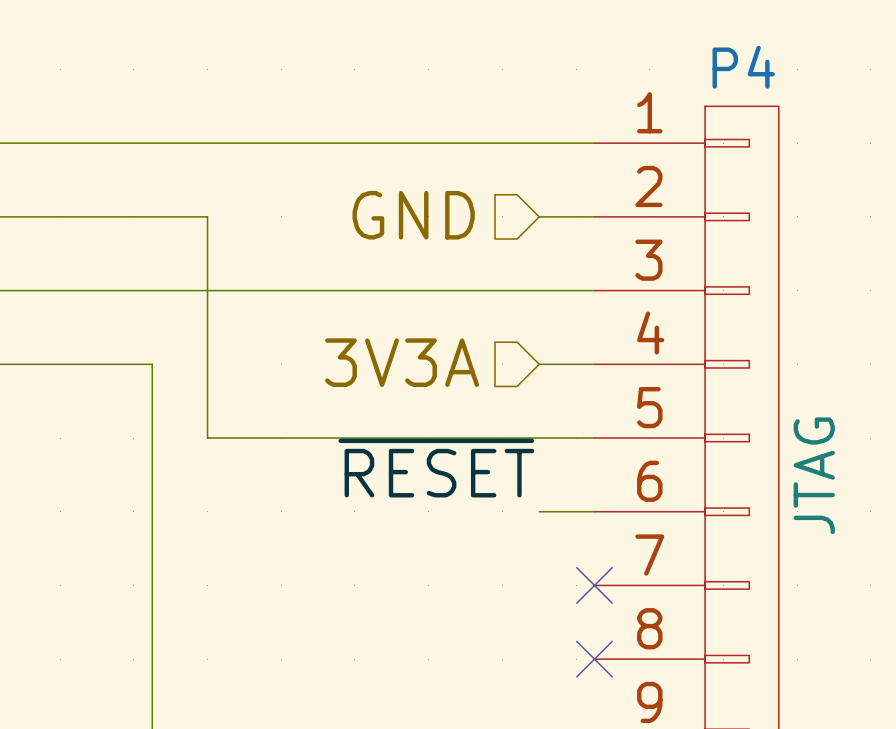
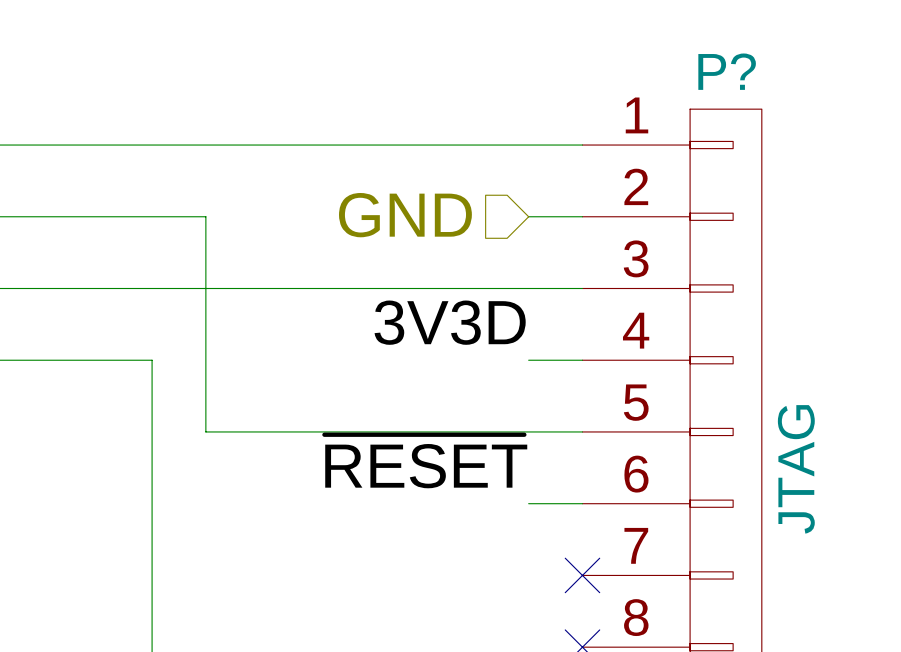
P4 name: P4 (743, 67) -> P? (727, 71)
label: none -> 3V3D (450, 322)
hierarchical label: 3V3A (402, 362) -> none

